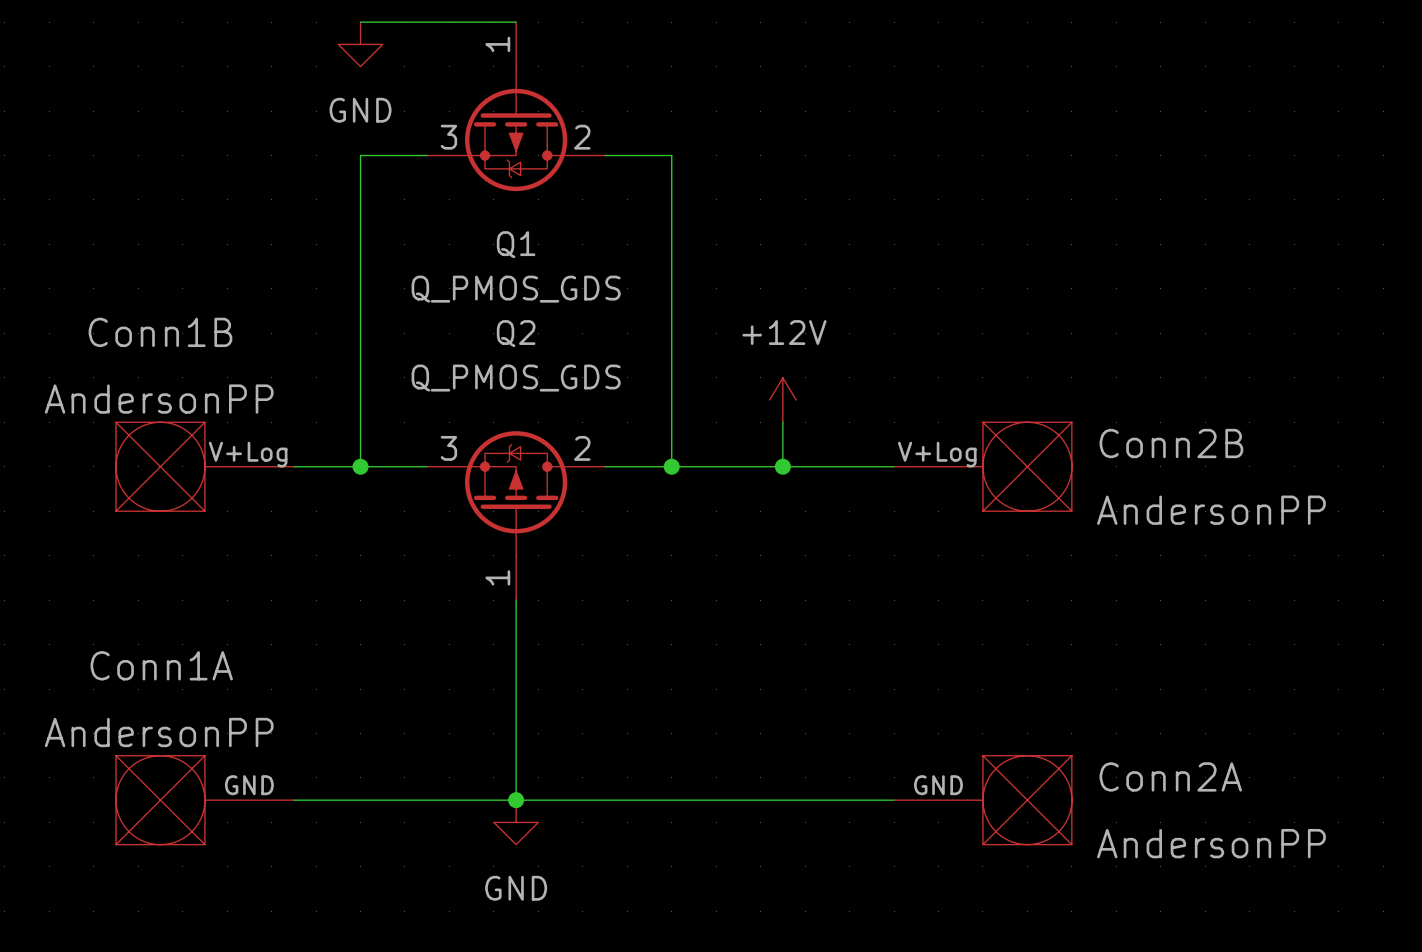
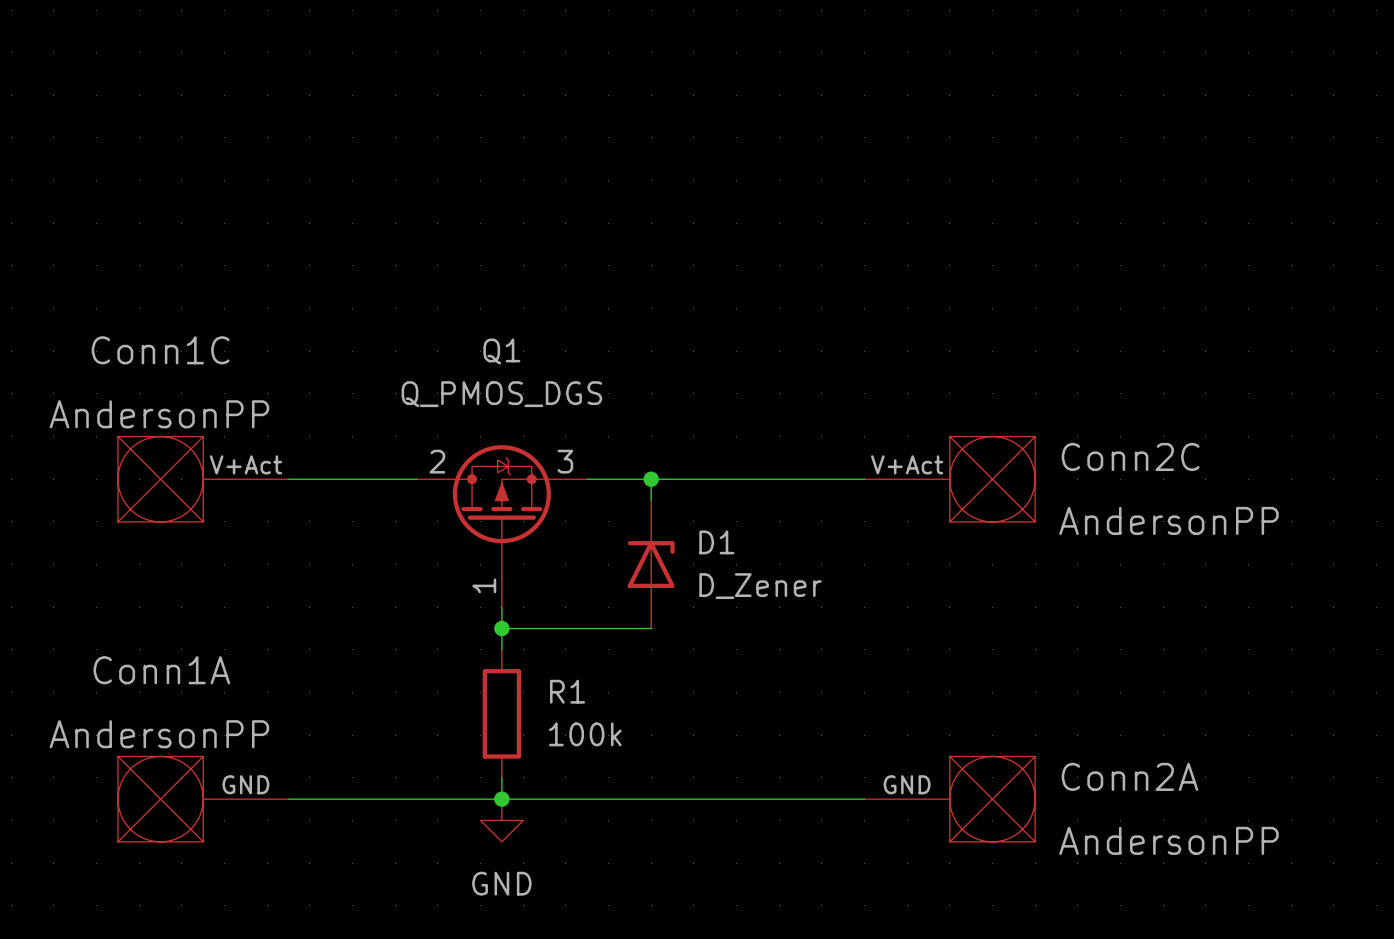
wire: (360, 22) (516, 22) -> none
power symbol: GND (360, 44) -> none
Q1 position: (516, 106) -> (501, 526)
Q1 rotation: 0° (516, 128) -> 180° (501, 504)
wire: (427, 155) (360, 155) (360, 466) -> none
wire: (605, 155) (671, 155) (671, 466) -> (651, 500) (651, 479)
Q1 name position: Q1 (516, 244) -> Q1 (501, 351)
Q1 value: Q_PMOS_GDS (516, 289) -> Q_PMOS_DGS (501, 394)
Conn1B name: Conn1B (160, 332) -> Conn1C (160, 350)
power symbol: +12V (782, 400) -> none
wire: (782, 422) (782, 466) -> none
Conn2B name: Conn2B (1171, 443) -> Conn2C (1130, 456)
Conn1B pin name: V+Log (248, 454) -> V+Act (245, 464)
Conn2B pin name: V+Log (937, 454) -> V+Act (907, 464)
junction: (360, 466) -> none
junction: (782, 466) -> none
Q2: Q_PMOS_GDS (516, 515) -> none
D1: none -> D_Zener (651, 564)
wire: none -> (501, 628) (651, 628)
junction: none -> (501, 628)
wire: (516, 644) (516, 777) -> none
R1: none -> 100k (501, 713)

